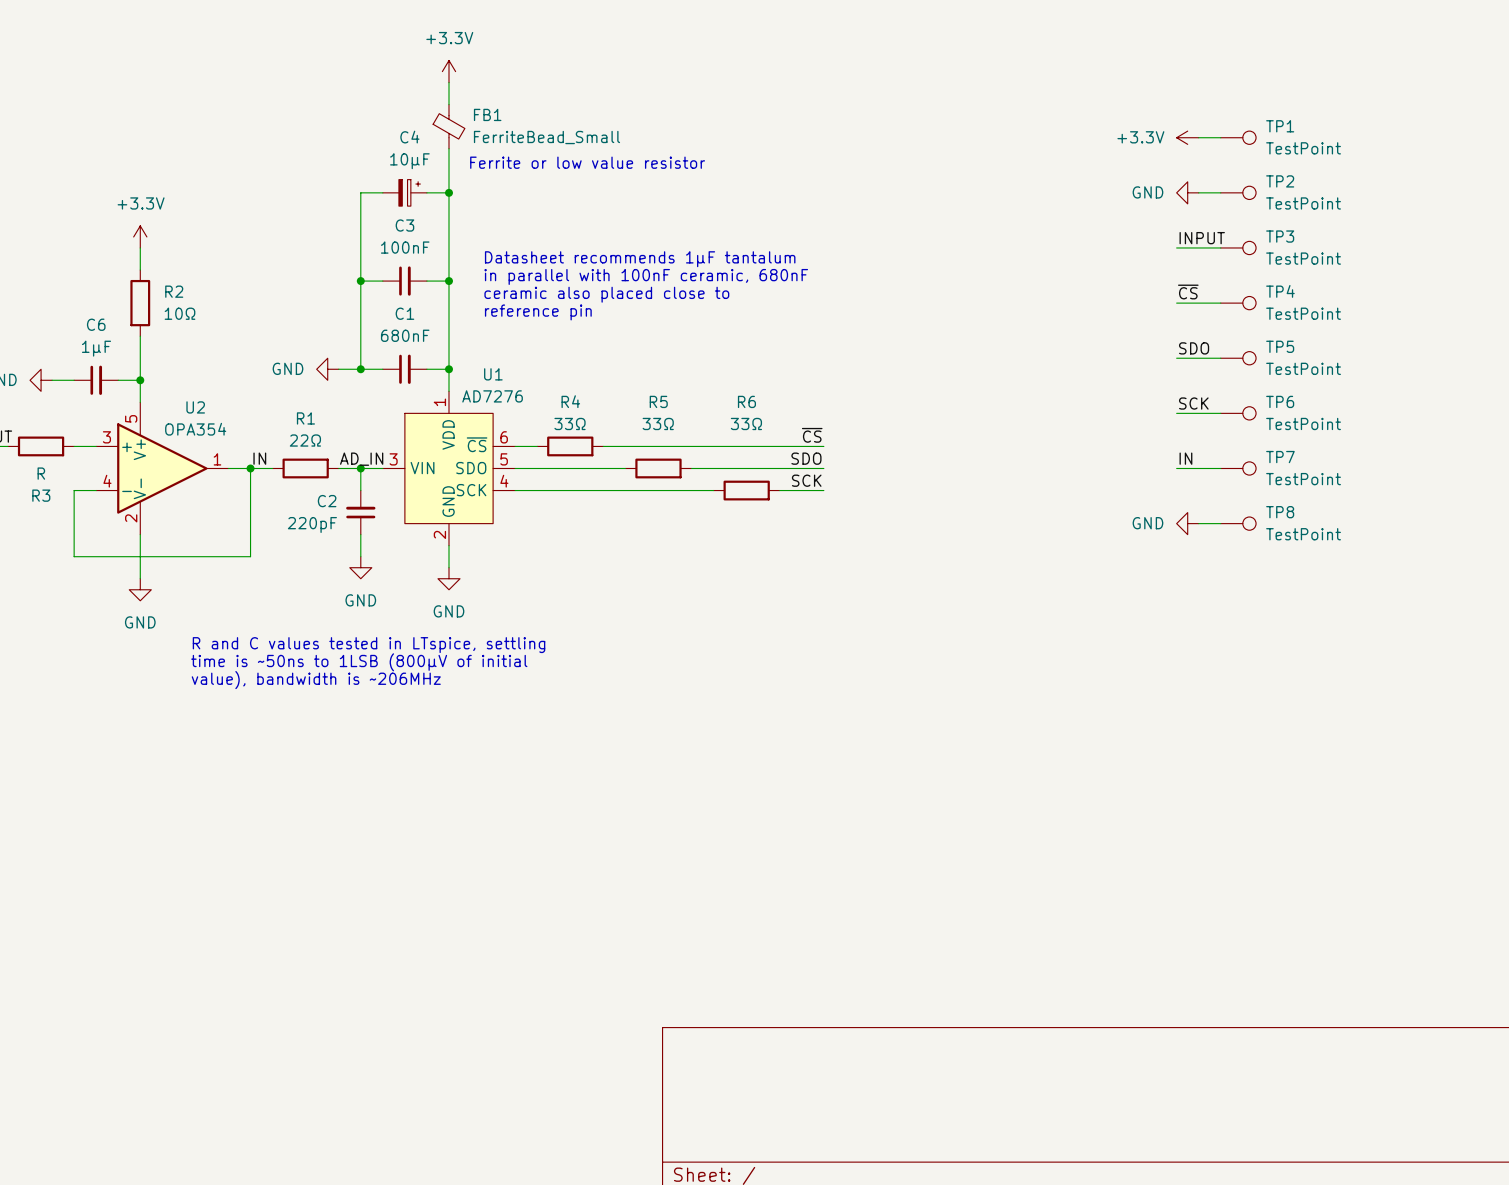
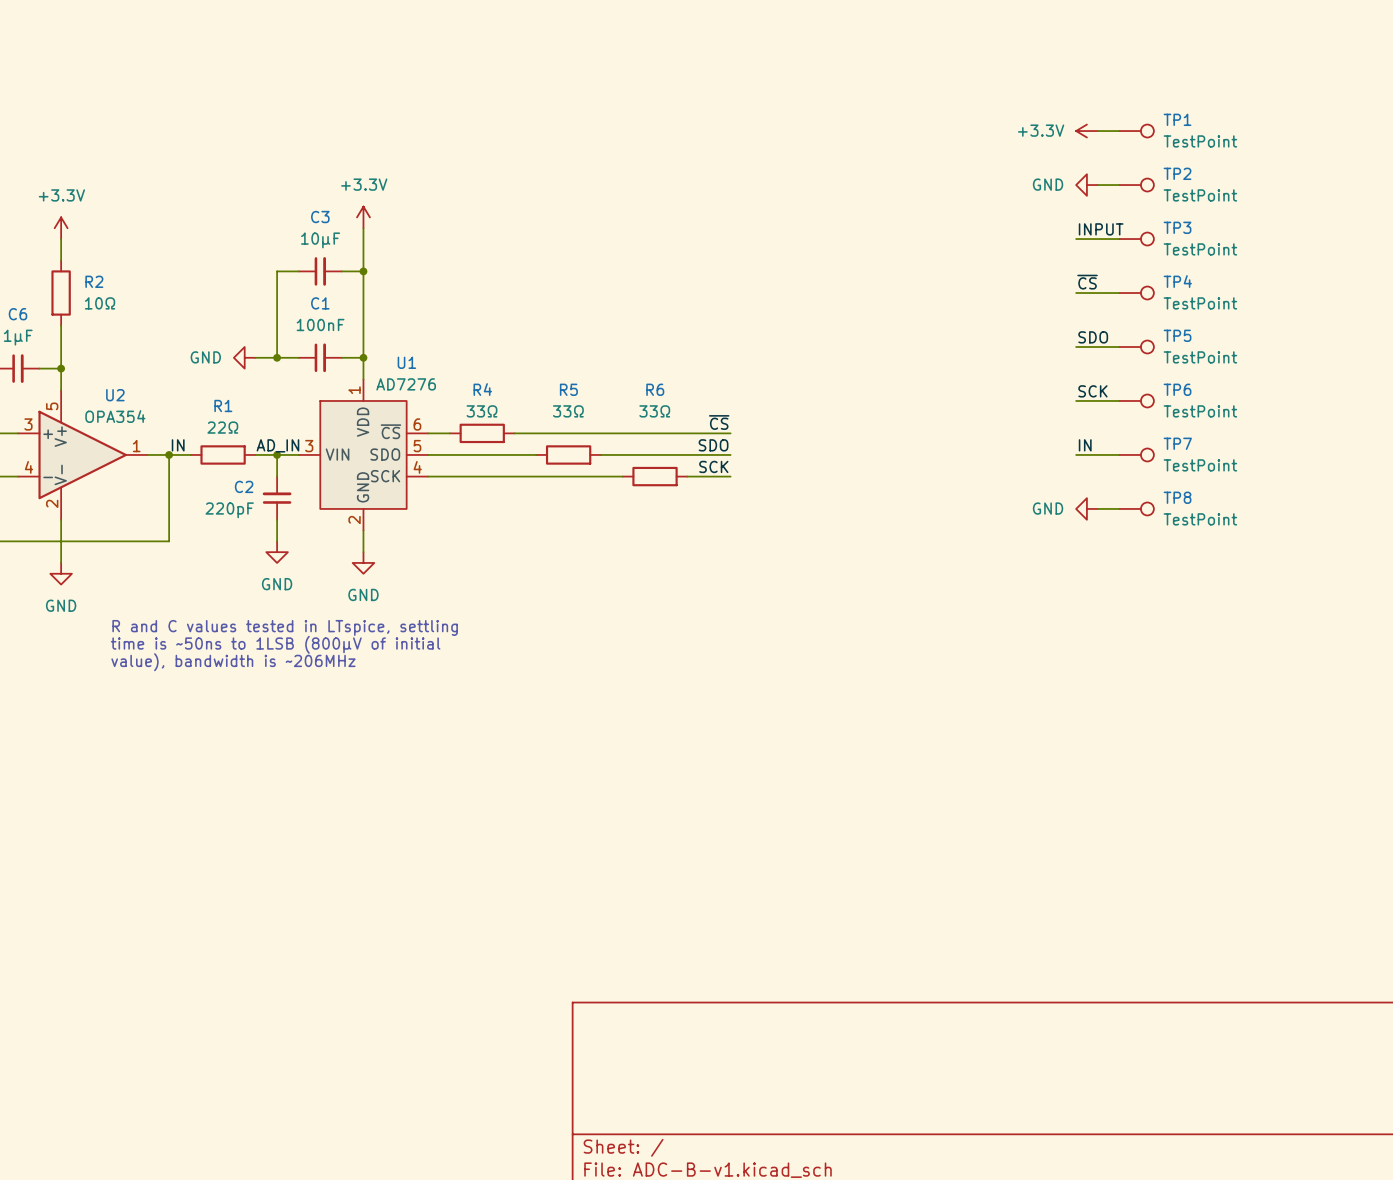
power symbol position: +3.3V (449, 71) -> +3.3V (363, 217)
wire: (449, 82) (449, 104) -> none
FB1: FerriteBead_Small (449, 126) -> none
wire: (449, 148) (449, 236) -> none
text: Ferrite or low value resistor (587, 162) -> none
wire: (382, 192) (360, 192) (360, 281) -> none
C4: 10μF (404, 192) -> none
wire: (426, 192) (449, 192) -> none
junction: (449, 192) -> none
C3 value: 100nF (405, 247) -> 10μF (320, 240)
text: Datasheet recommends 1μF tantalum (640, 259) -> none
text: in parallel with 100nF ceramic, 680nF (646, 276) -> none
junction: (360, 281) -> none
text: ceramic also placed close to (606, 294) -> none
text: reference pin (538, 312) -> none
C1 value: 680nF (405, 335) -> 100nF (320, 325)

